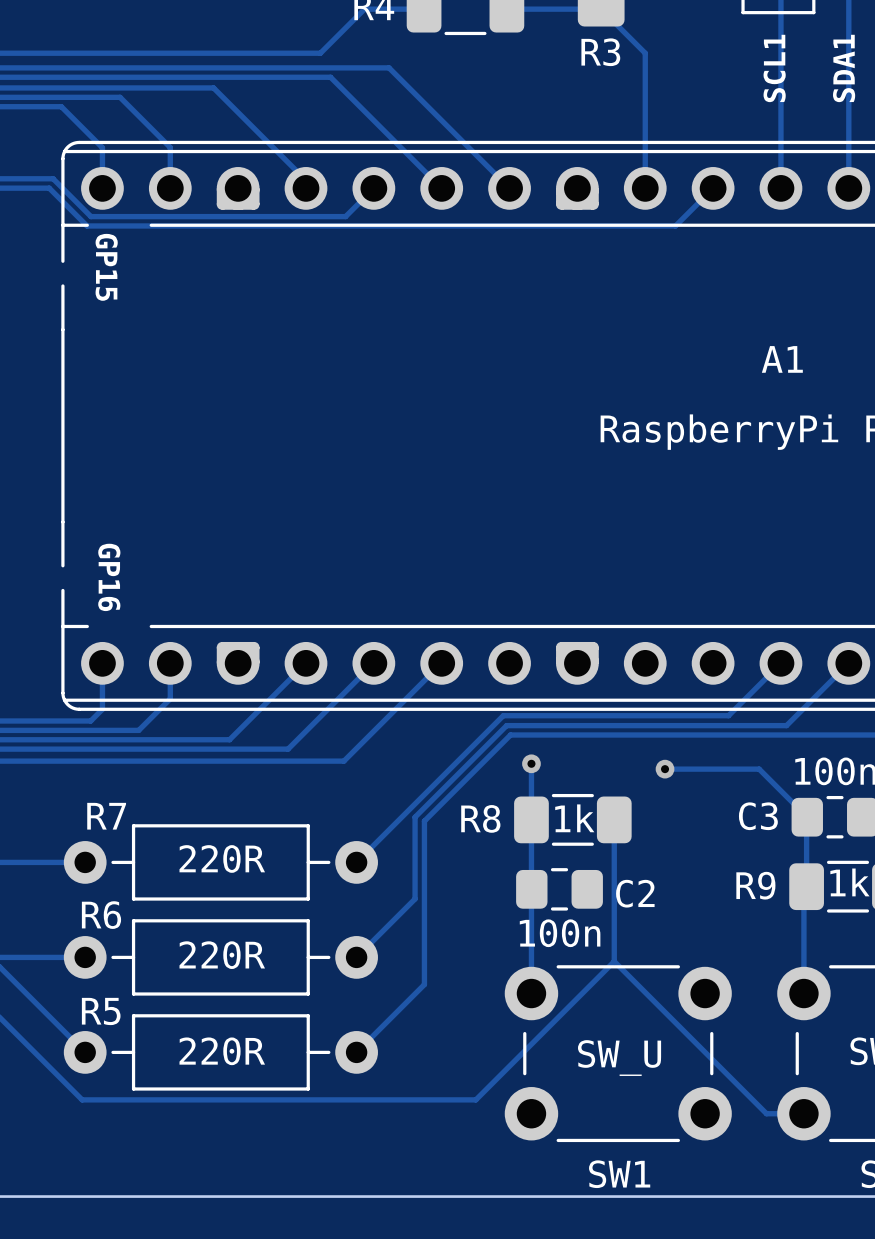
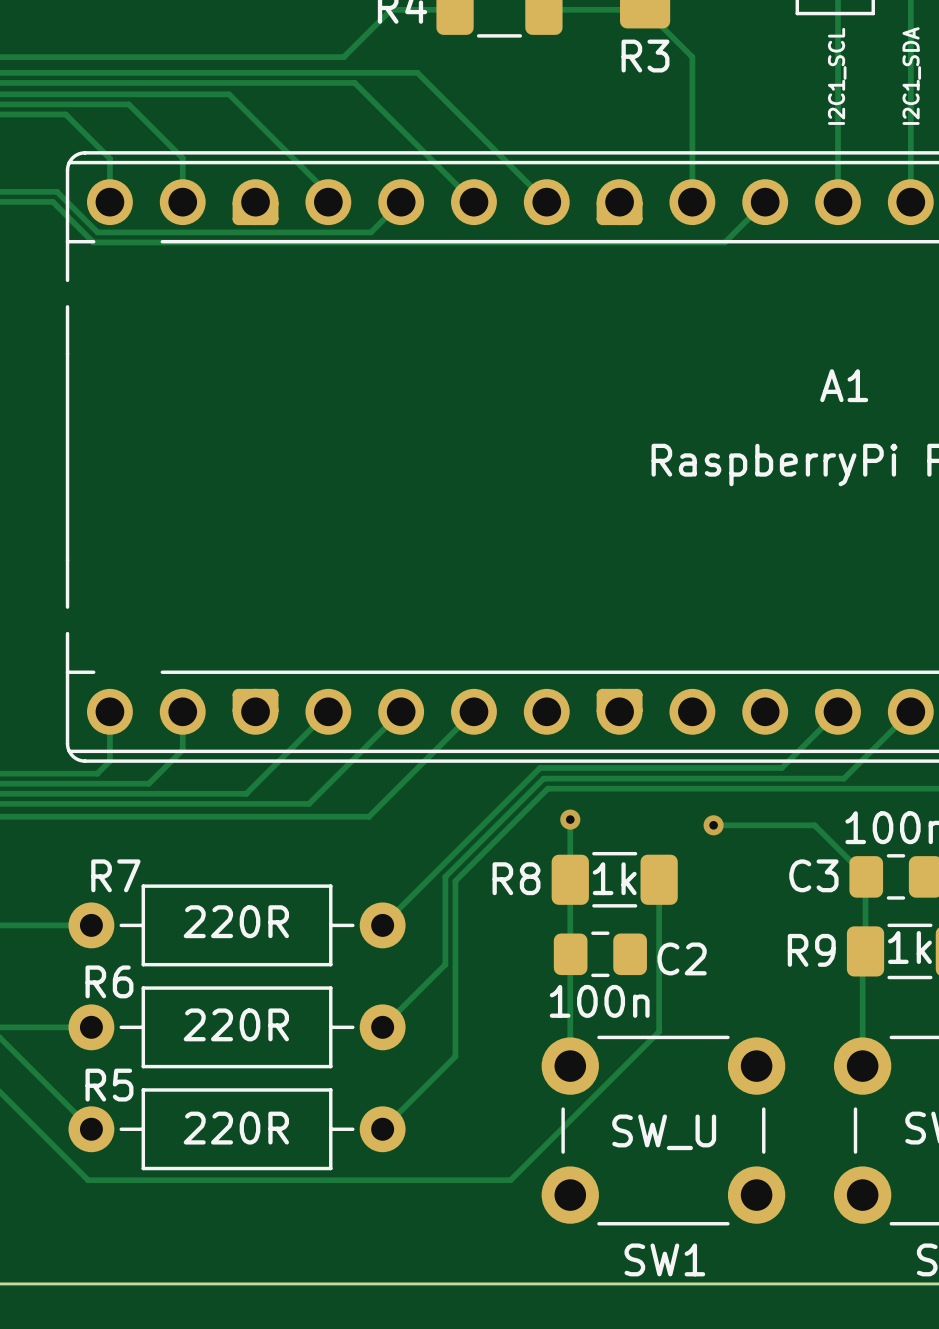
text: SCL1 (774, 68) -> I2C1_SCL (837, 76)
text: SDA1 (844, 68) -> I2C1_SDA (911, 76)
text: GP15 (106, 267) -> none
text: GP16 (109, 577) -> none
track: (614, 961) (766, 1113) (803, 1113) -> none

